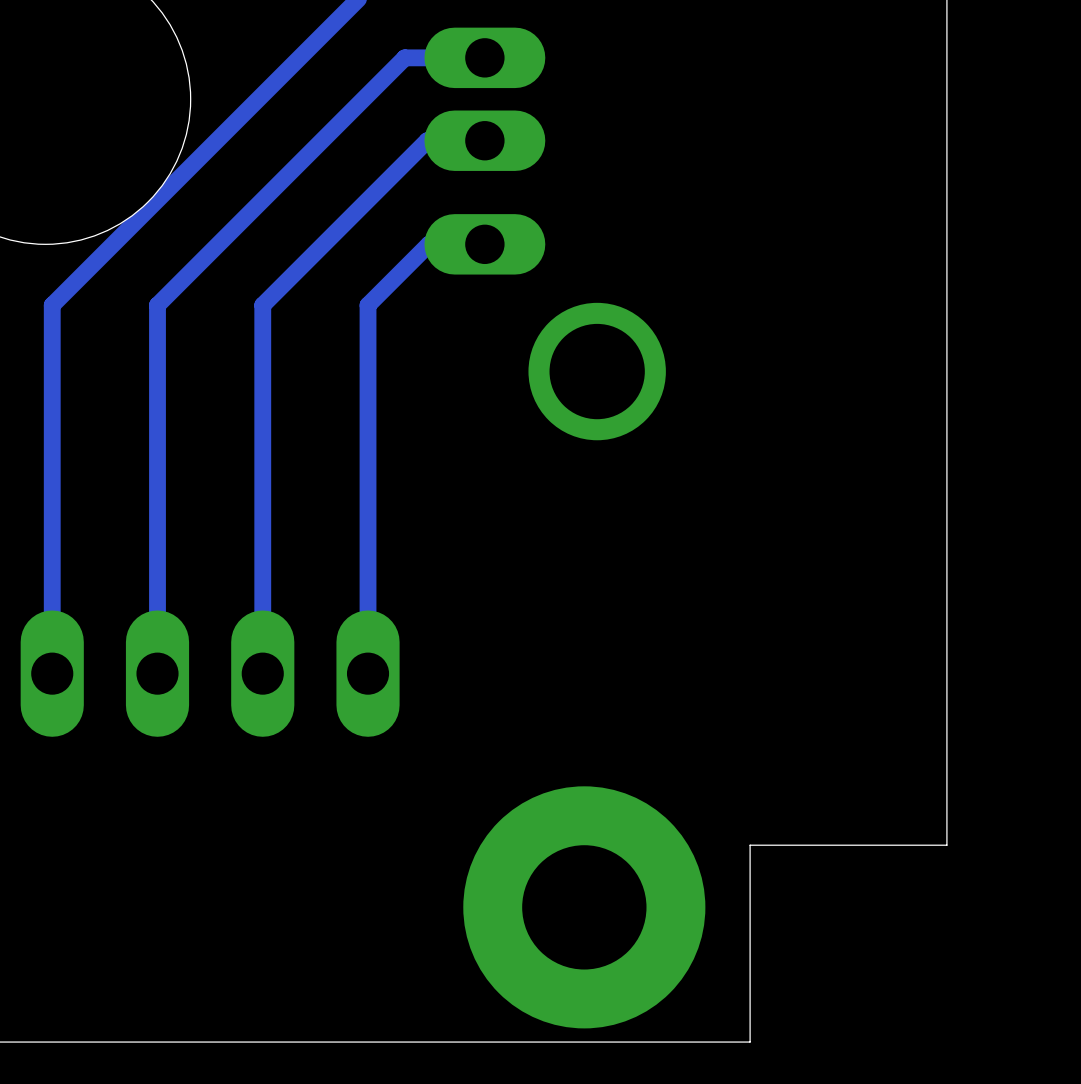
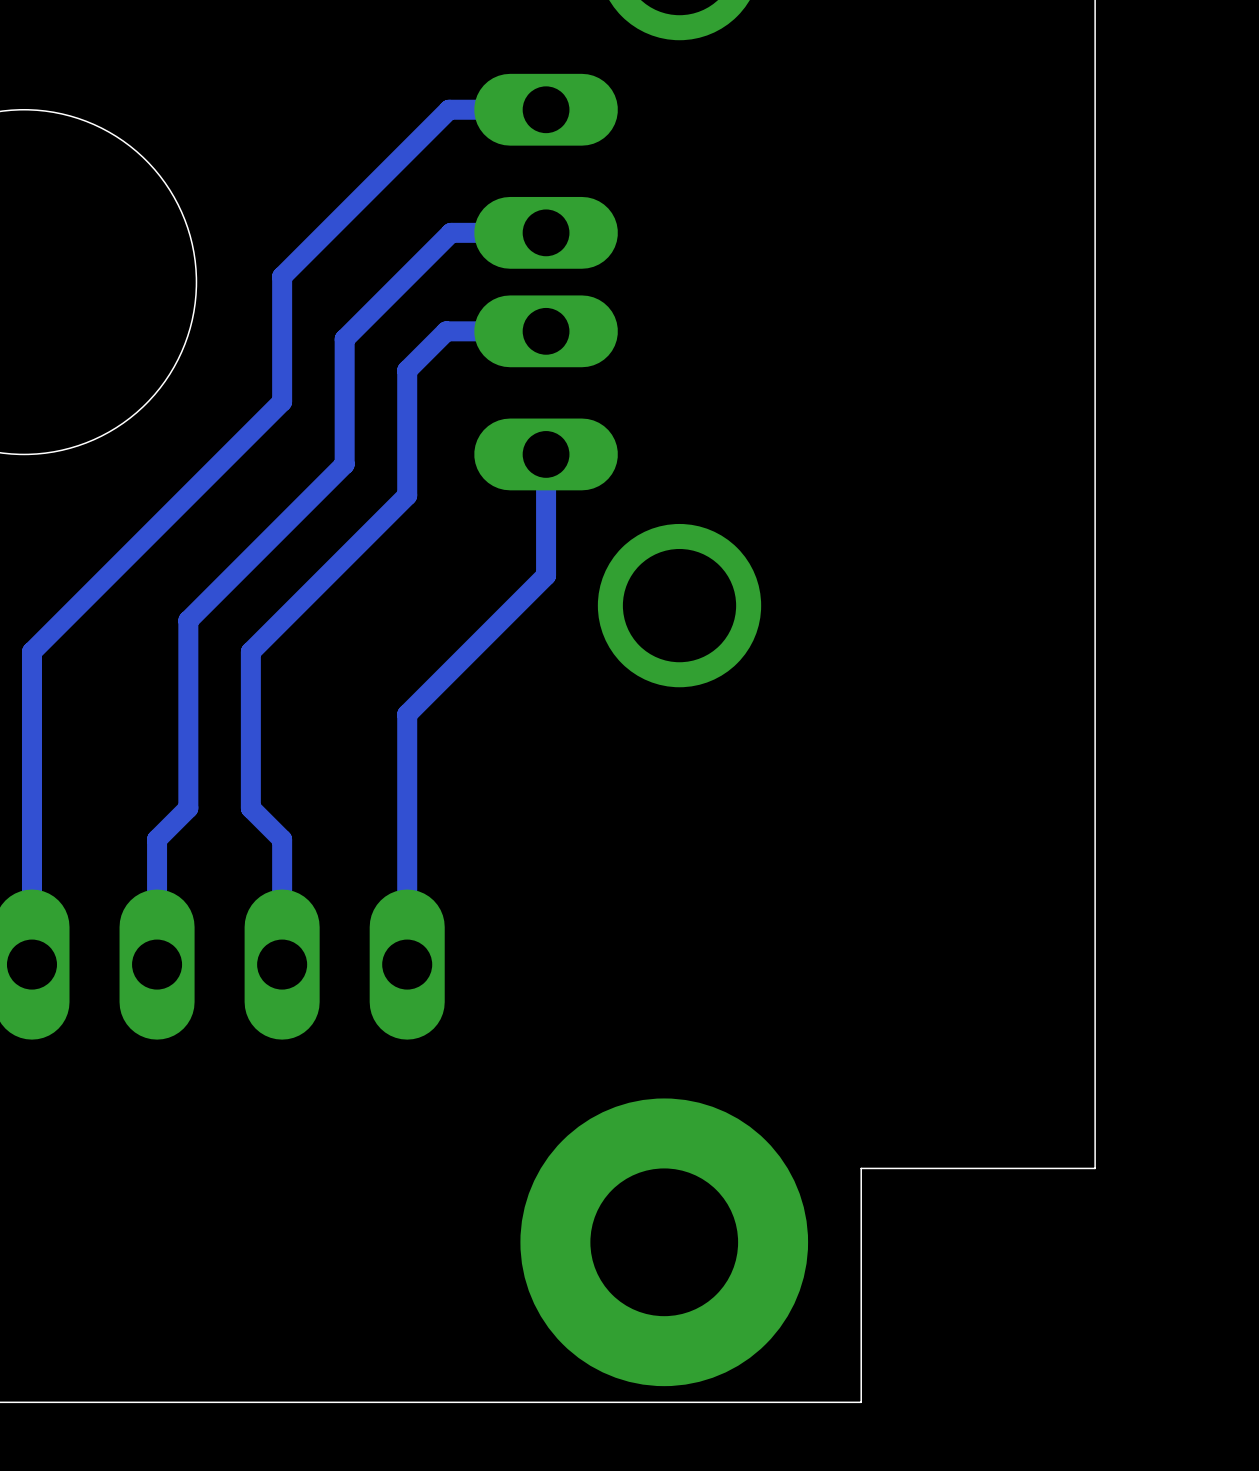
track: (262, 94) (52, 305) (52, 410) -> none
track: (427, 140) (315, 252) -> (344, 339) (344, 464)
track: none -> (477, 331) (446, 331) (407, 370) (407, 495) (250, 651) (250, 808) (282, 839)
track: (315, 147) (262, 199) -> (282, 276) (282, 401)
track: (484, 244) (428, 244) (368, 305) (368, 463) -> (546, 454) (546, 575) (407, 714)
track: (157, 305) (157, 568) -> (157, 526) (31, 651)
track: (262, 305) (262, 568) -> (282, 526) (188, 620) (188, 808) (157, 839)

